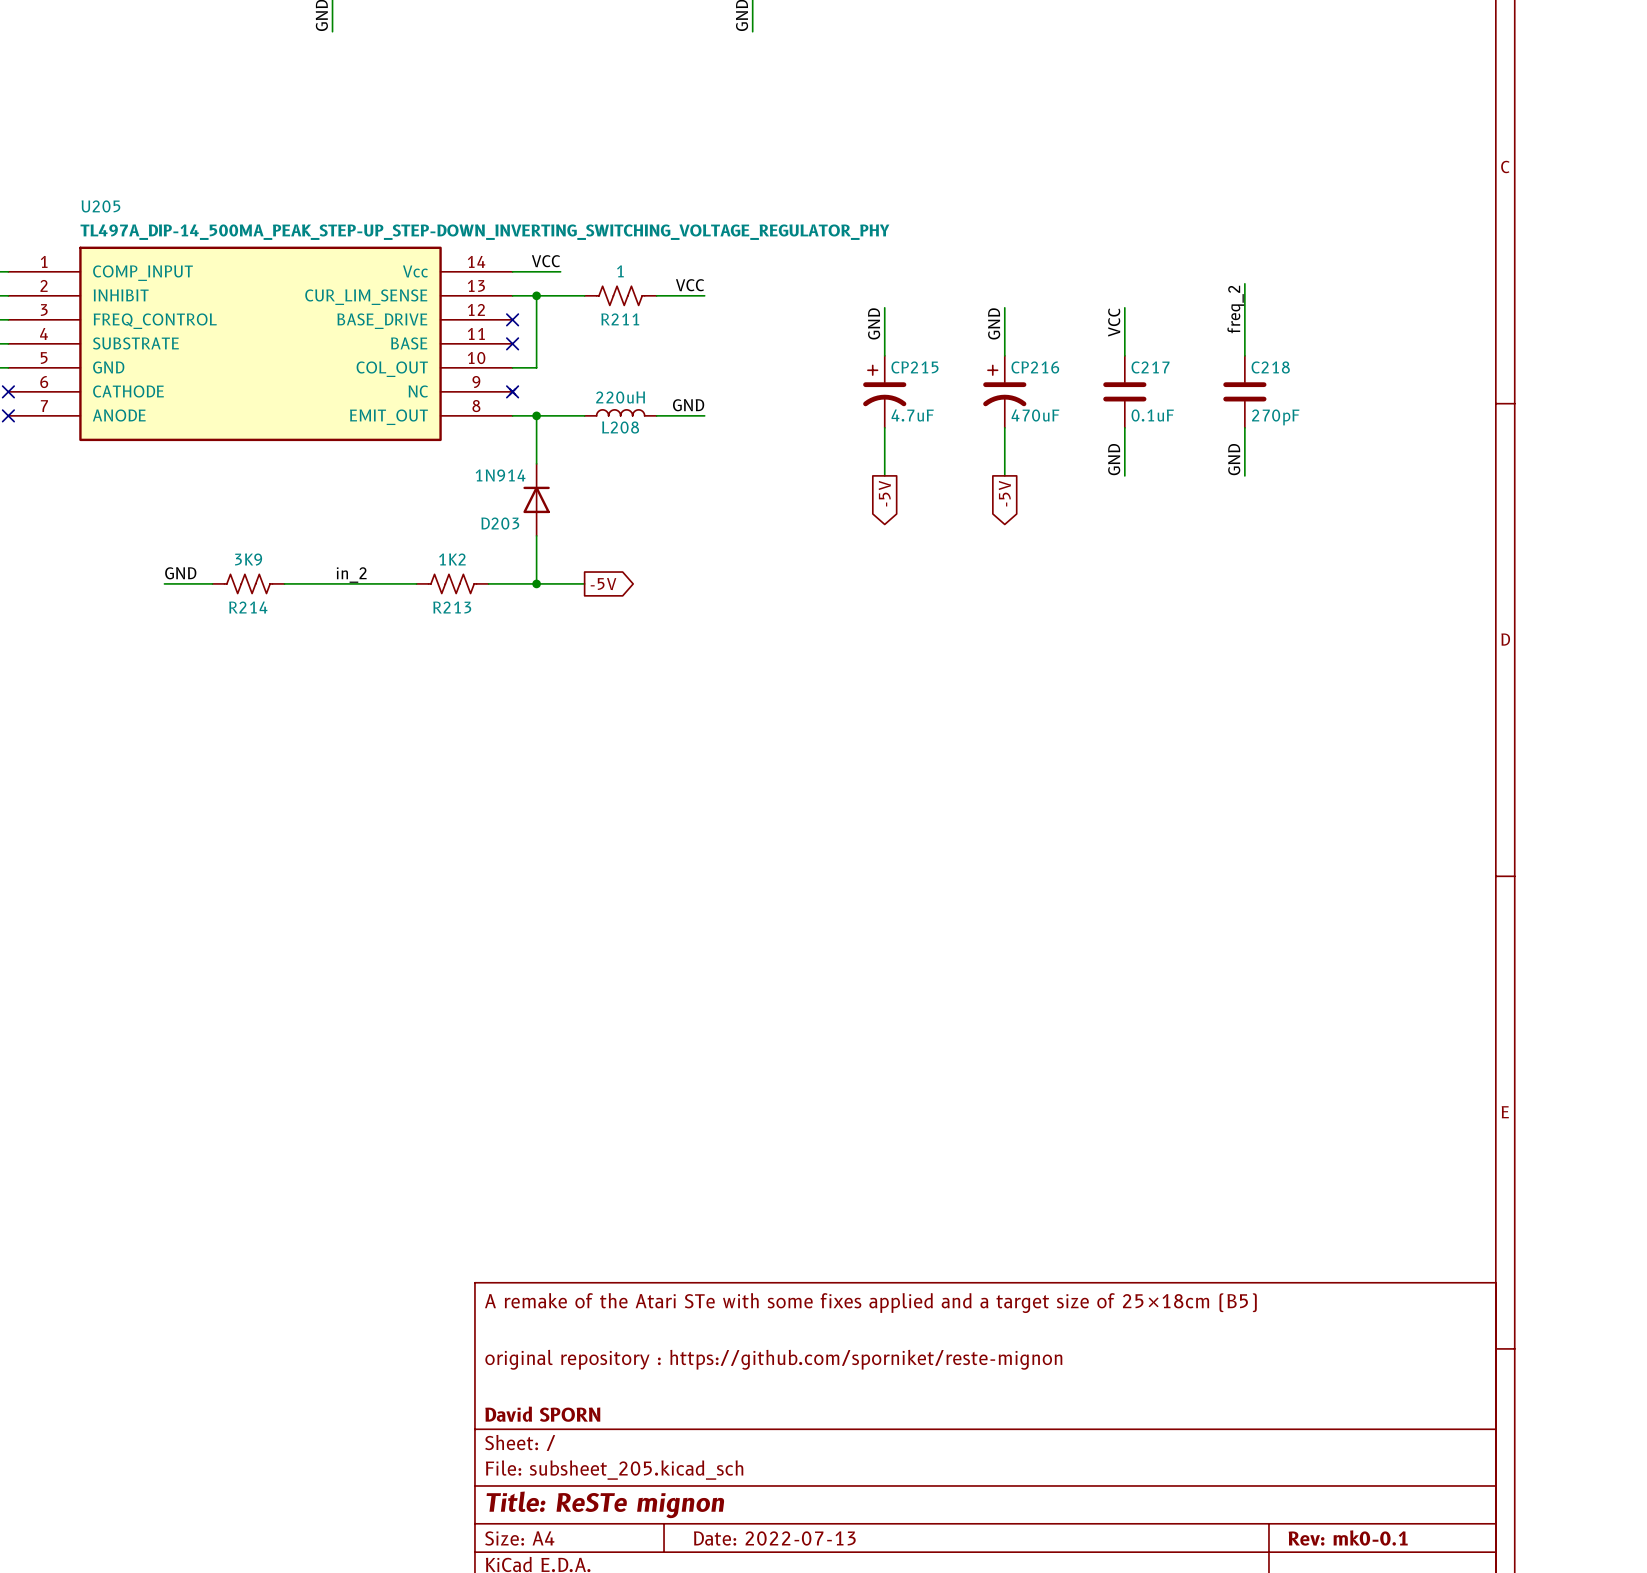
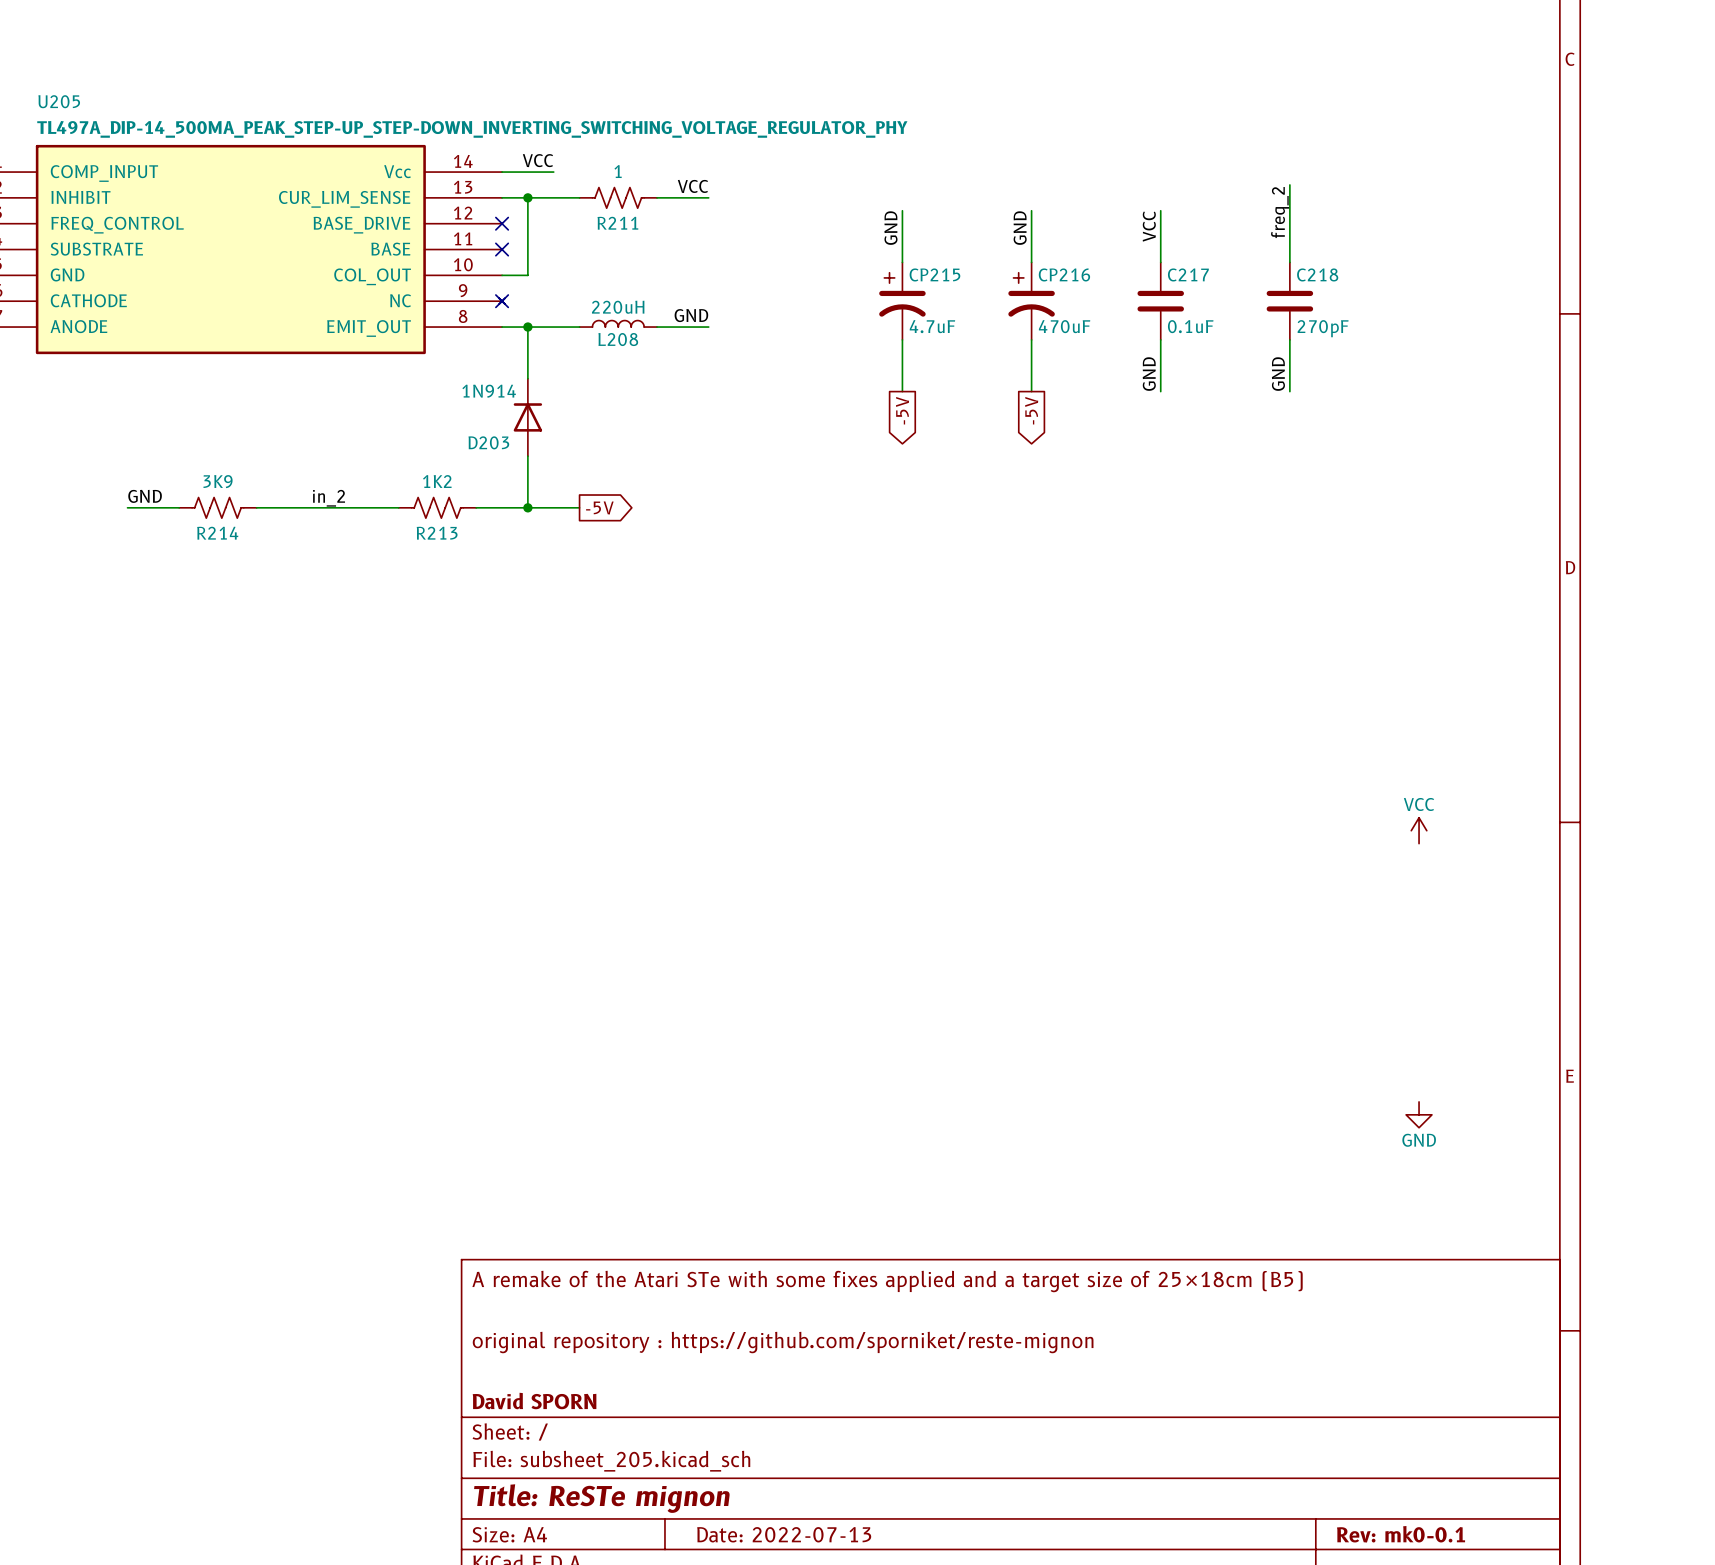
power symbol: none -> VCC (1419, 830)
power symbol: none -> GND (1419, 1114)

